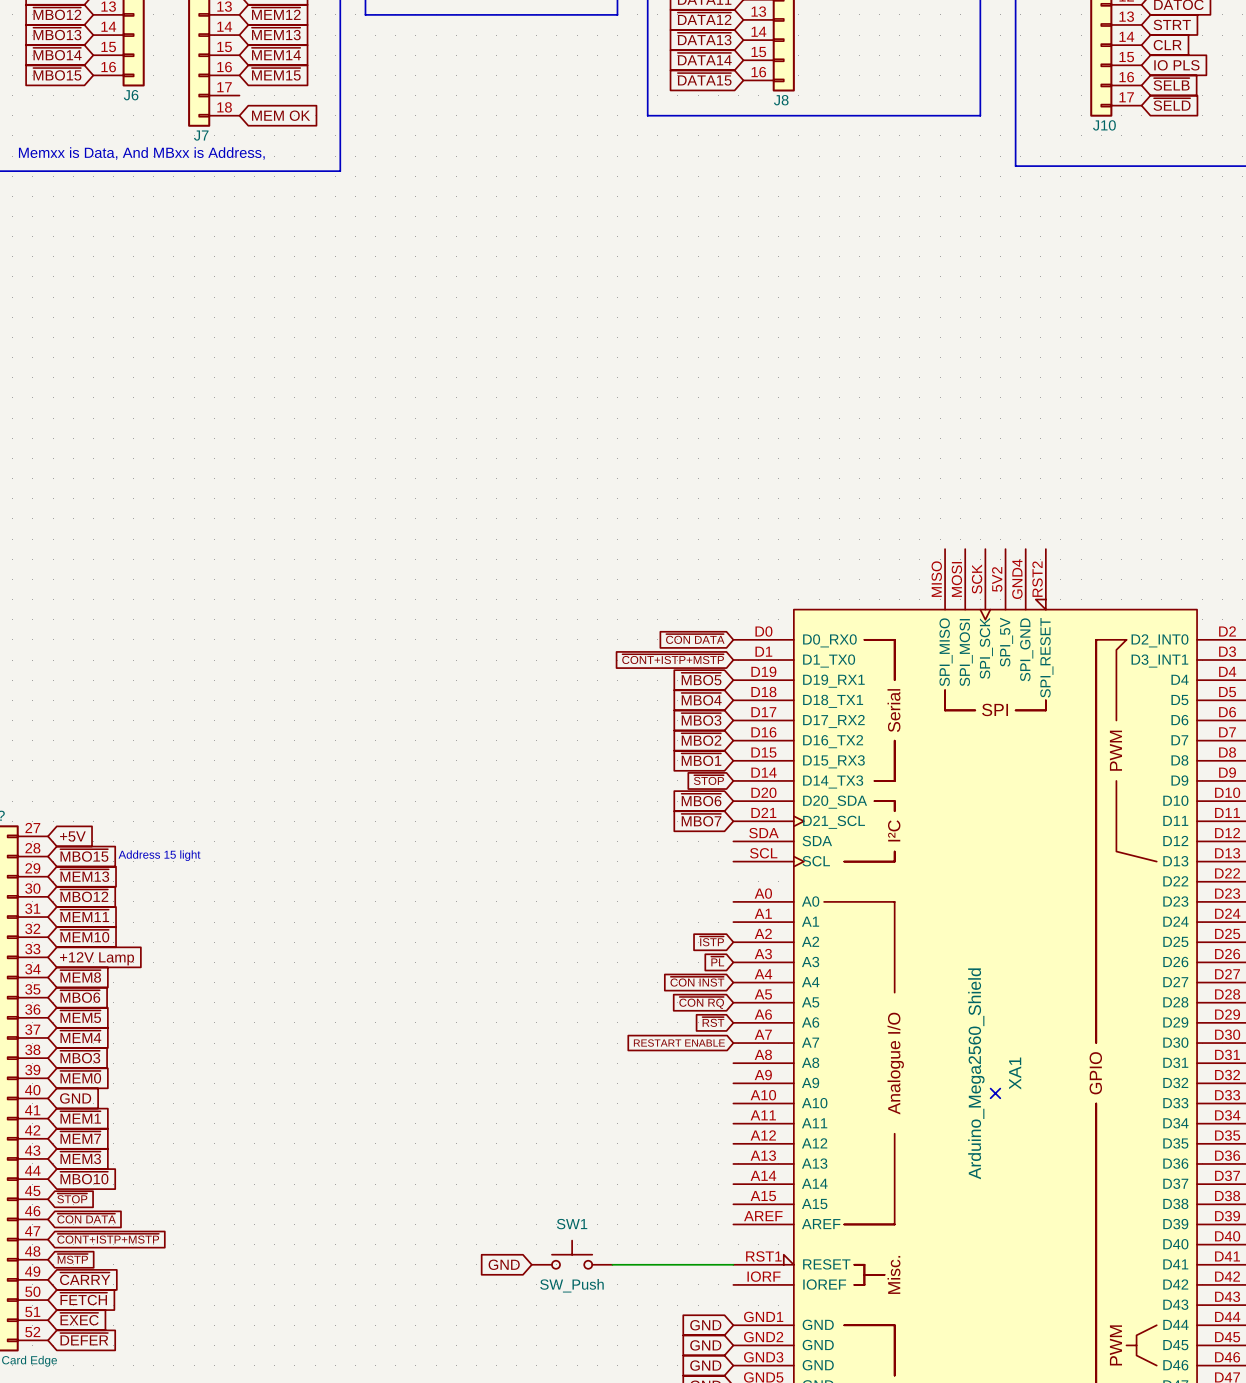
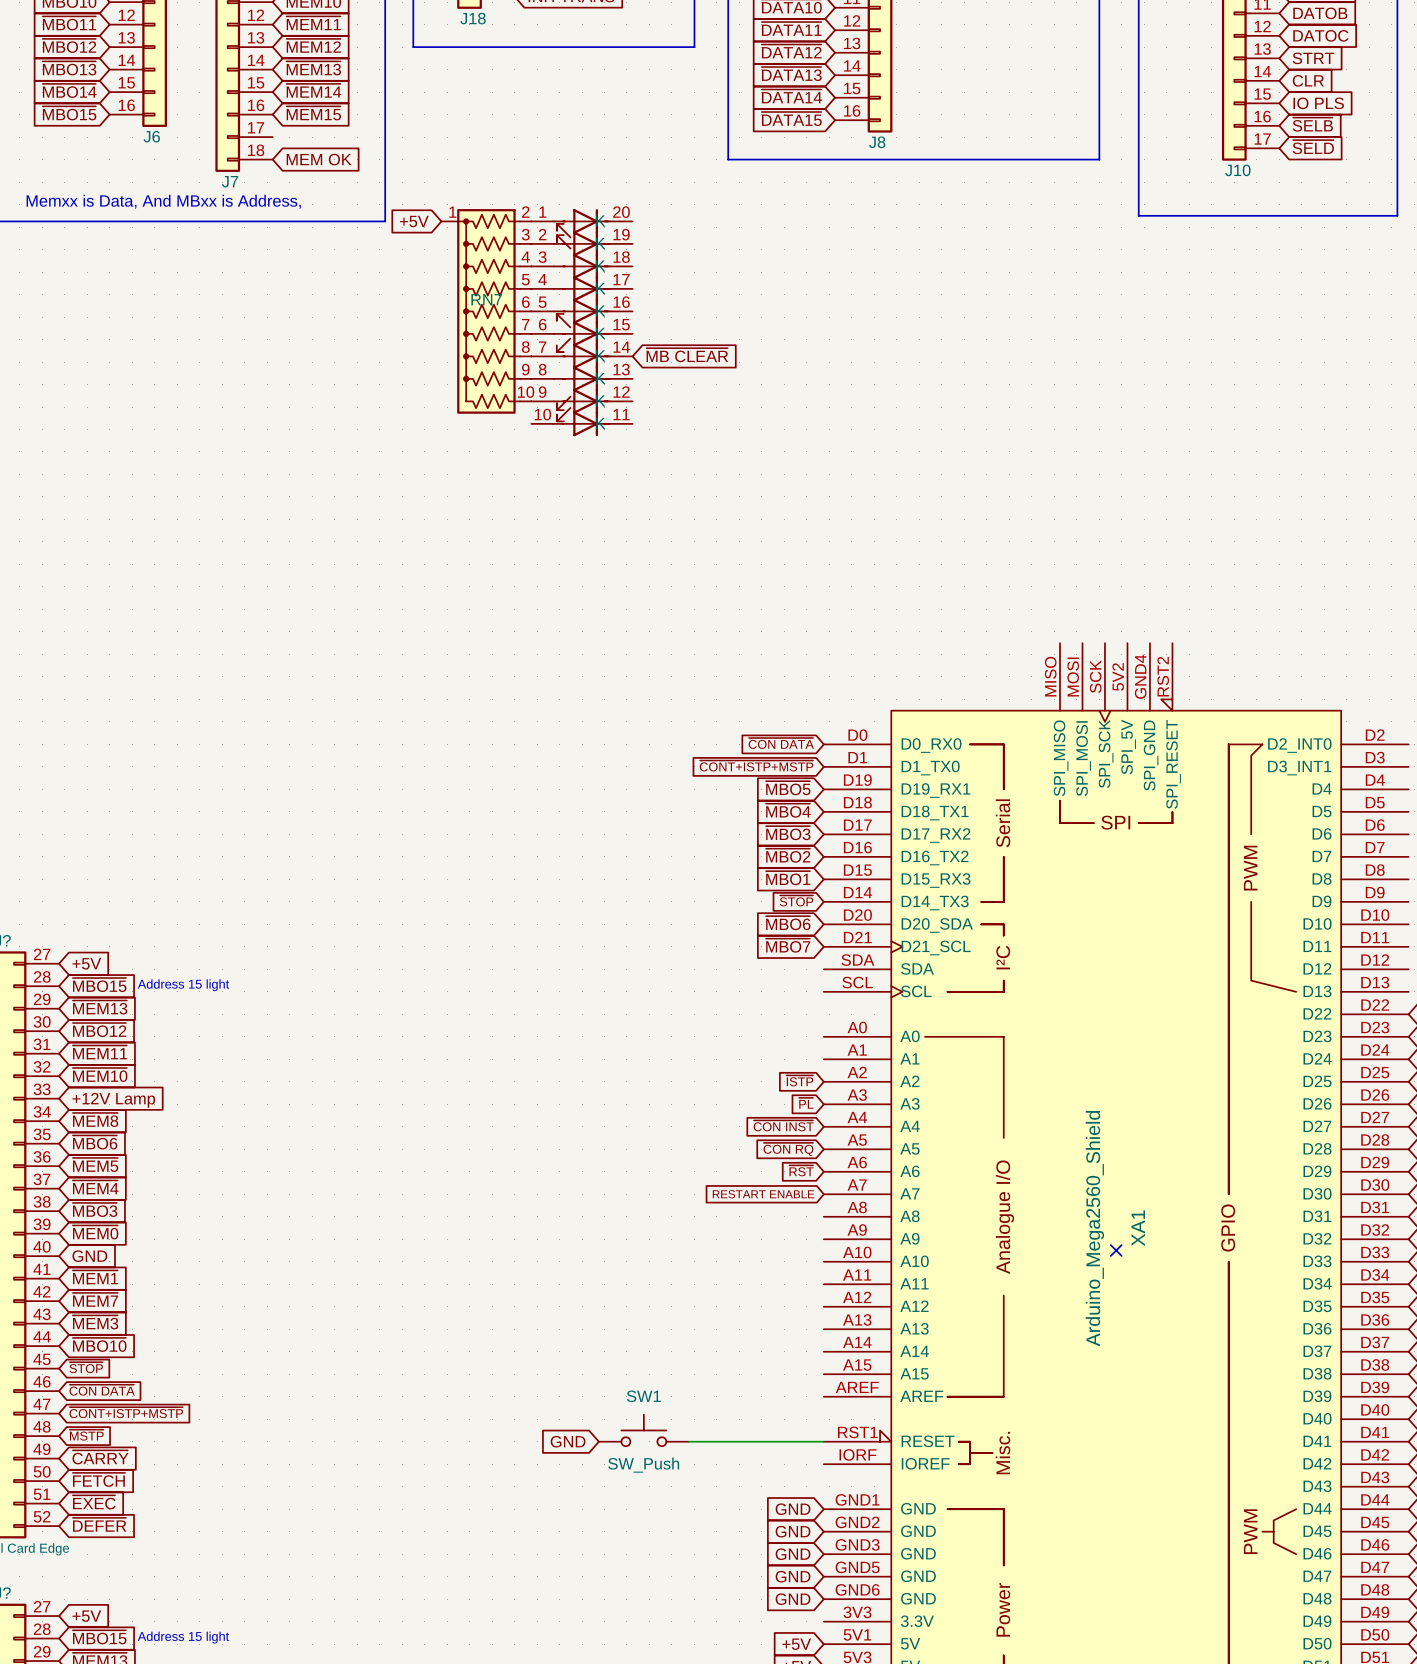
global label: none -> +5V (414, 221)
RN7: none -> (486, 311)
part: none -> (582, 322)
global label: none -> ~{MB CLEAR} (687, 355)

